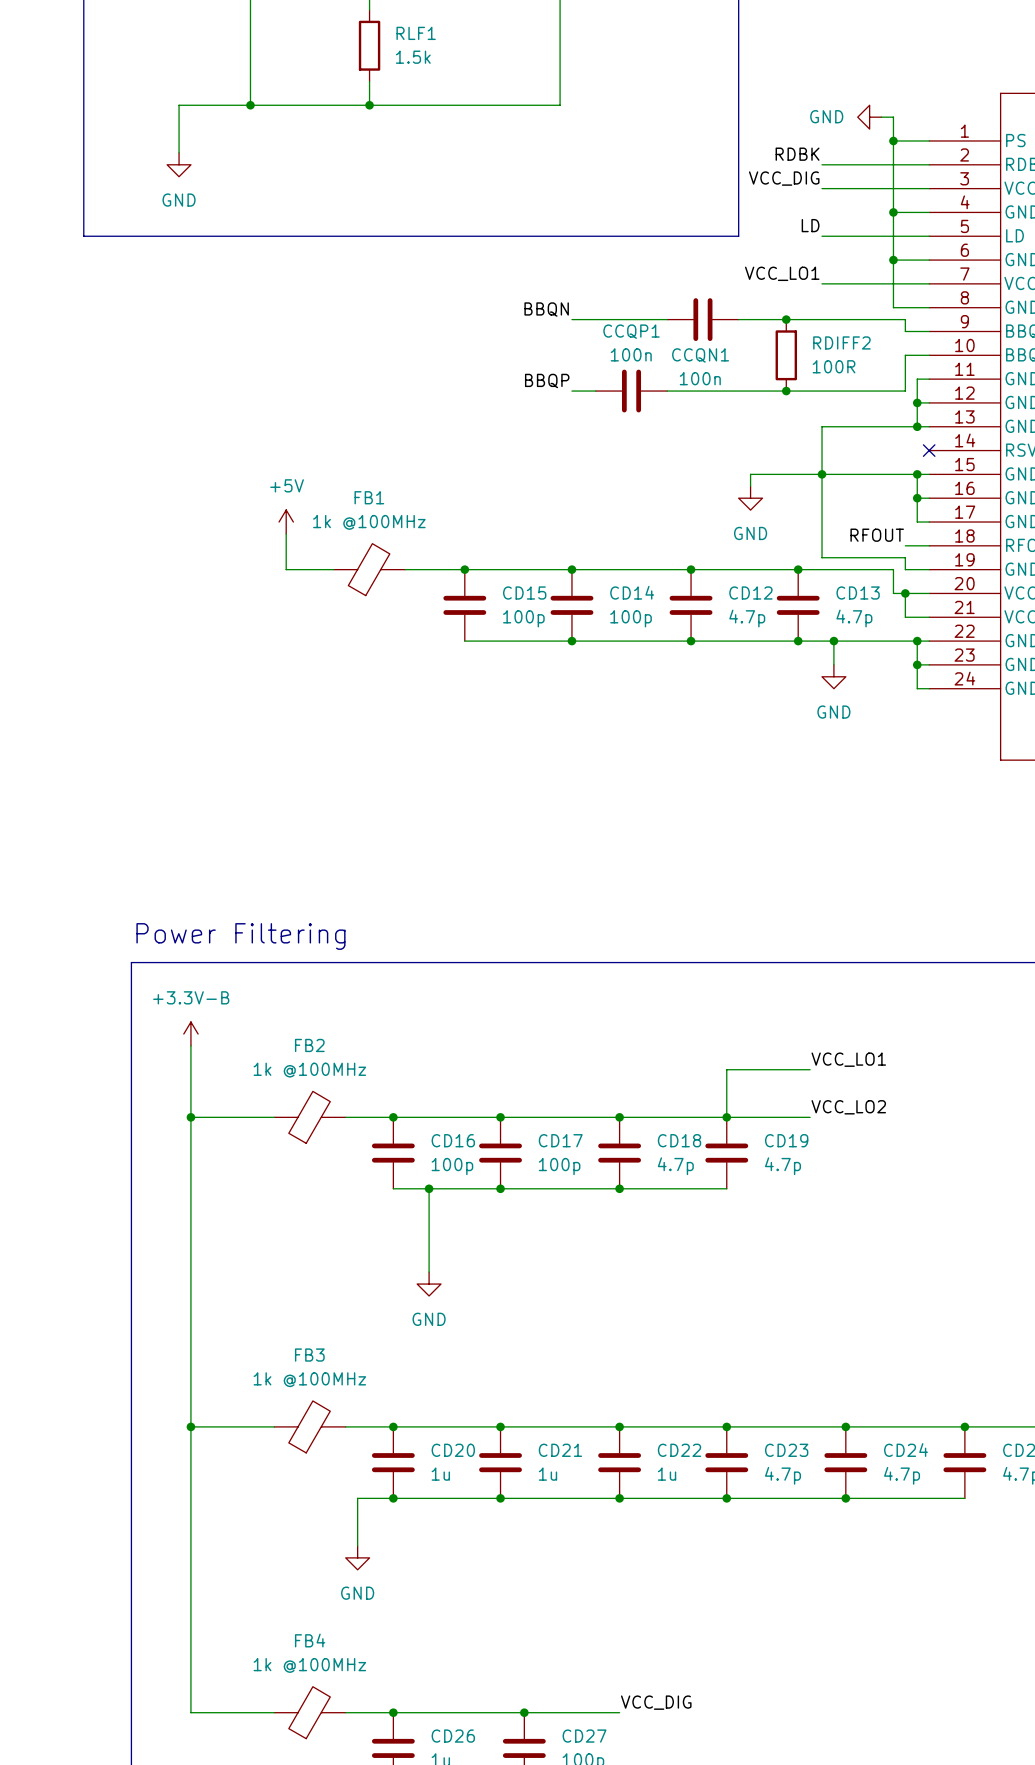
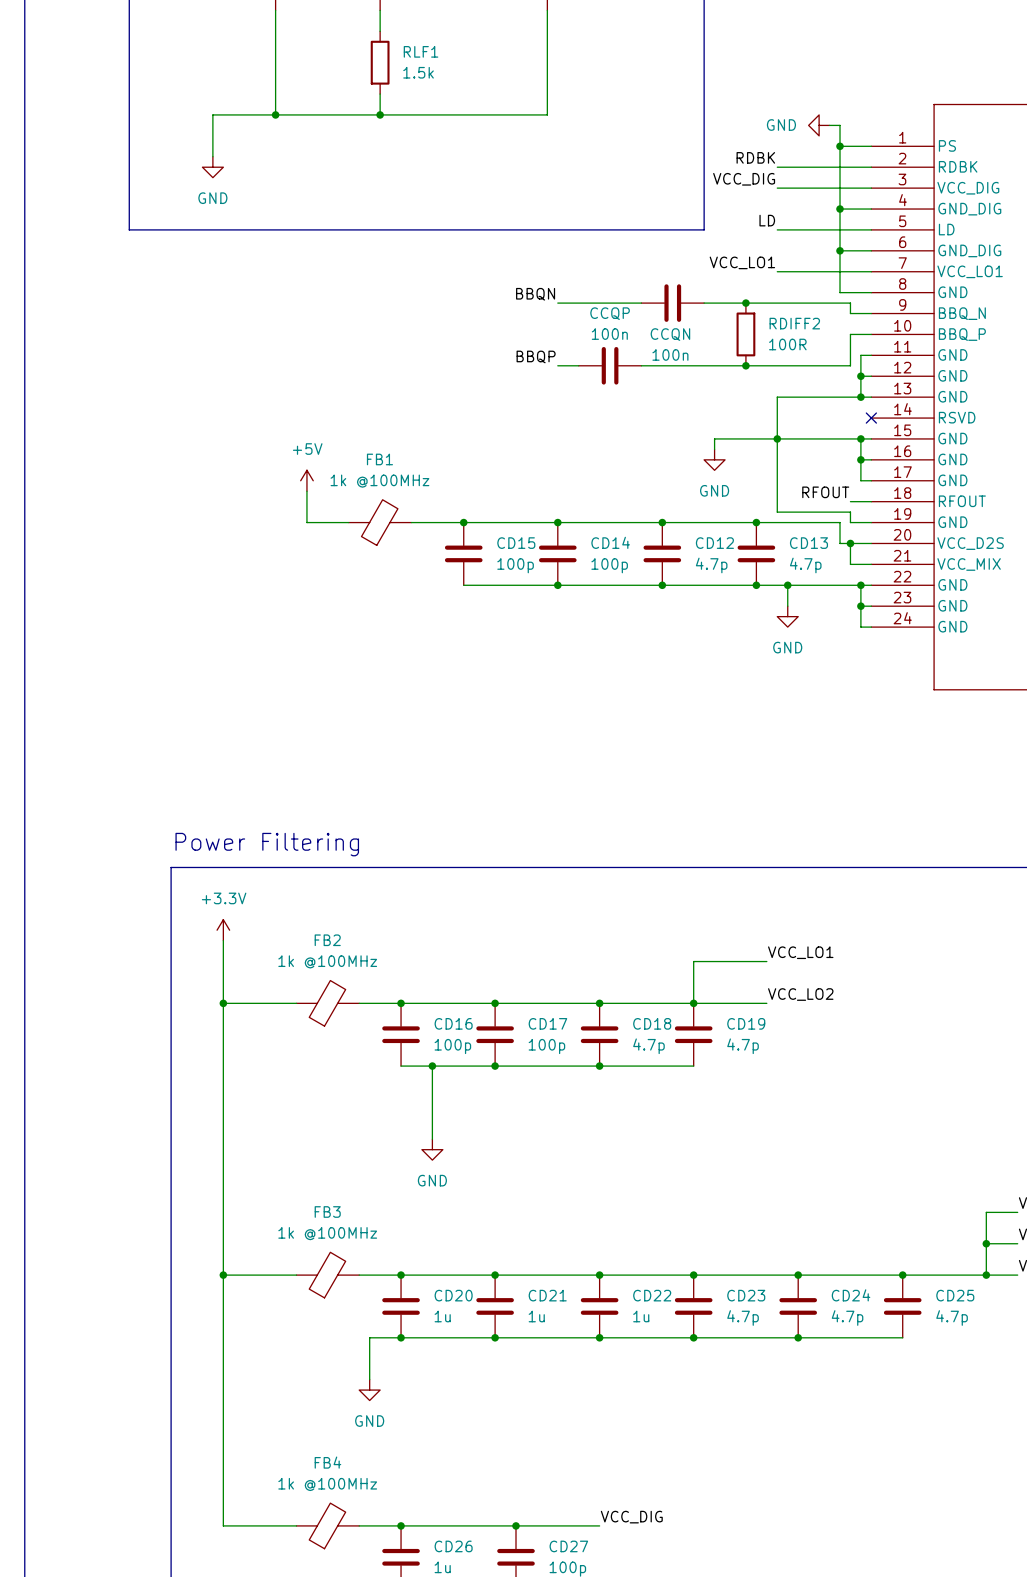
CCQP1 name: CCQP1 (631, 331) -> CCQP (610, 313)
CCQN1 name: CCQN1 (700, 355) -> CCQN (670, 334)
power symbol: +3.3V-B (190, 1034) -> +3.3V (223, 930)

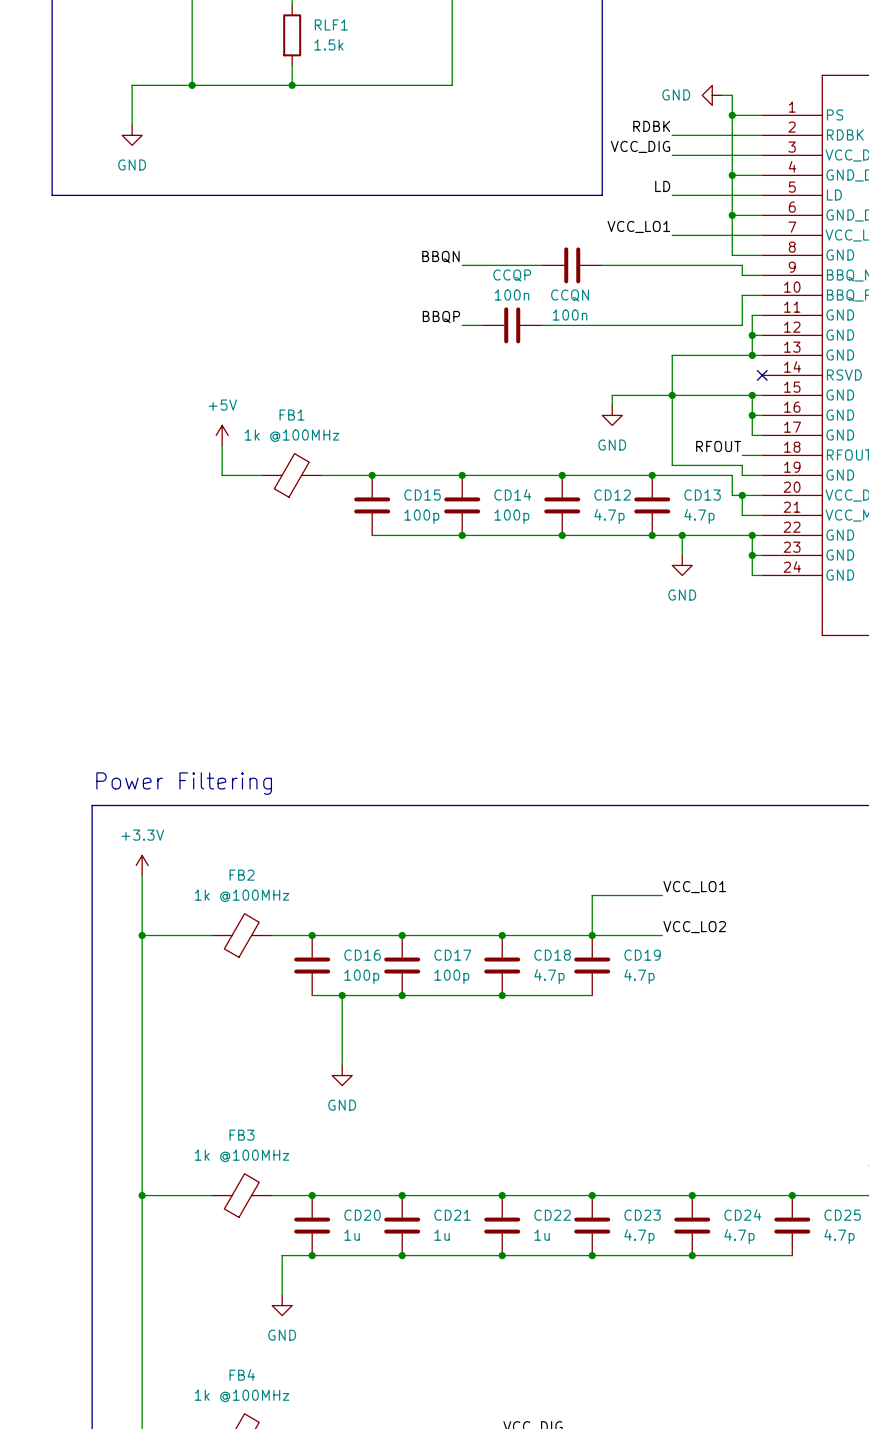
junction: (745, 303) -> none
RDIFF2: 100R (745, 334) -> none
junction: (745, 365) -> none

